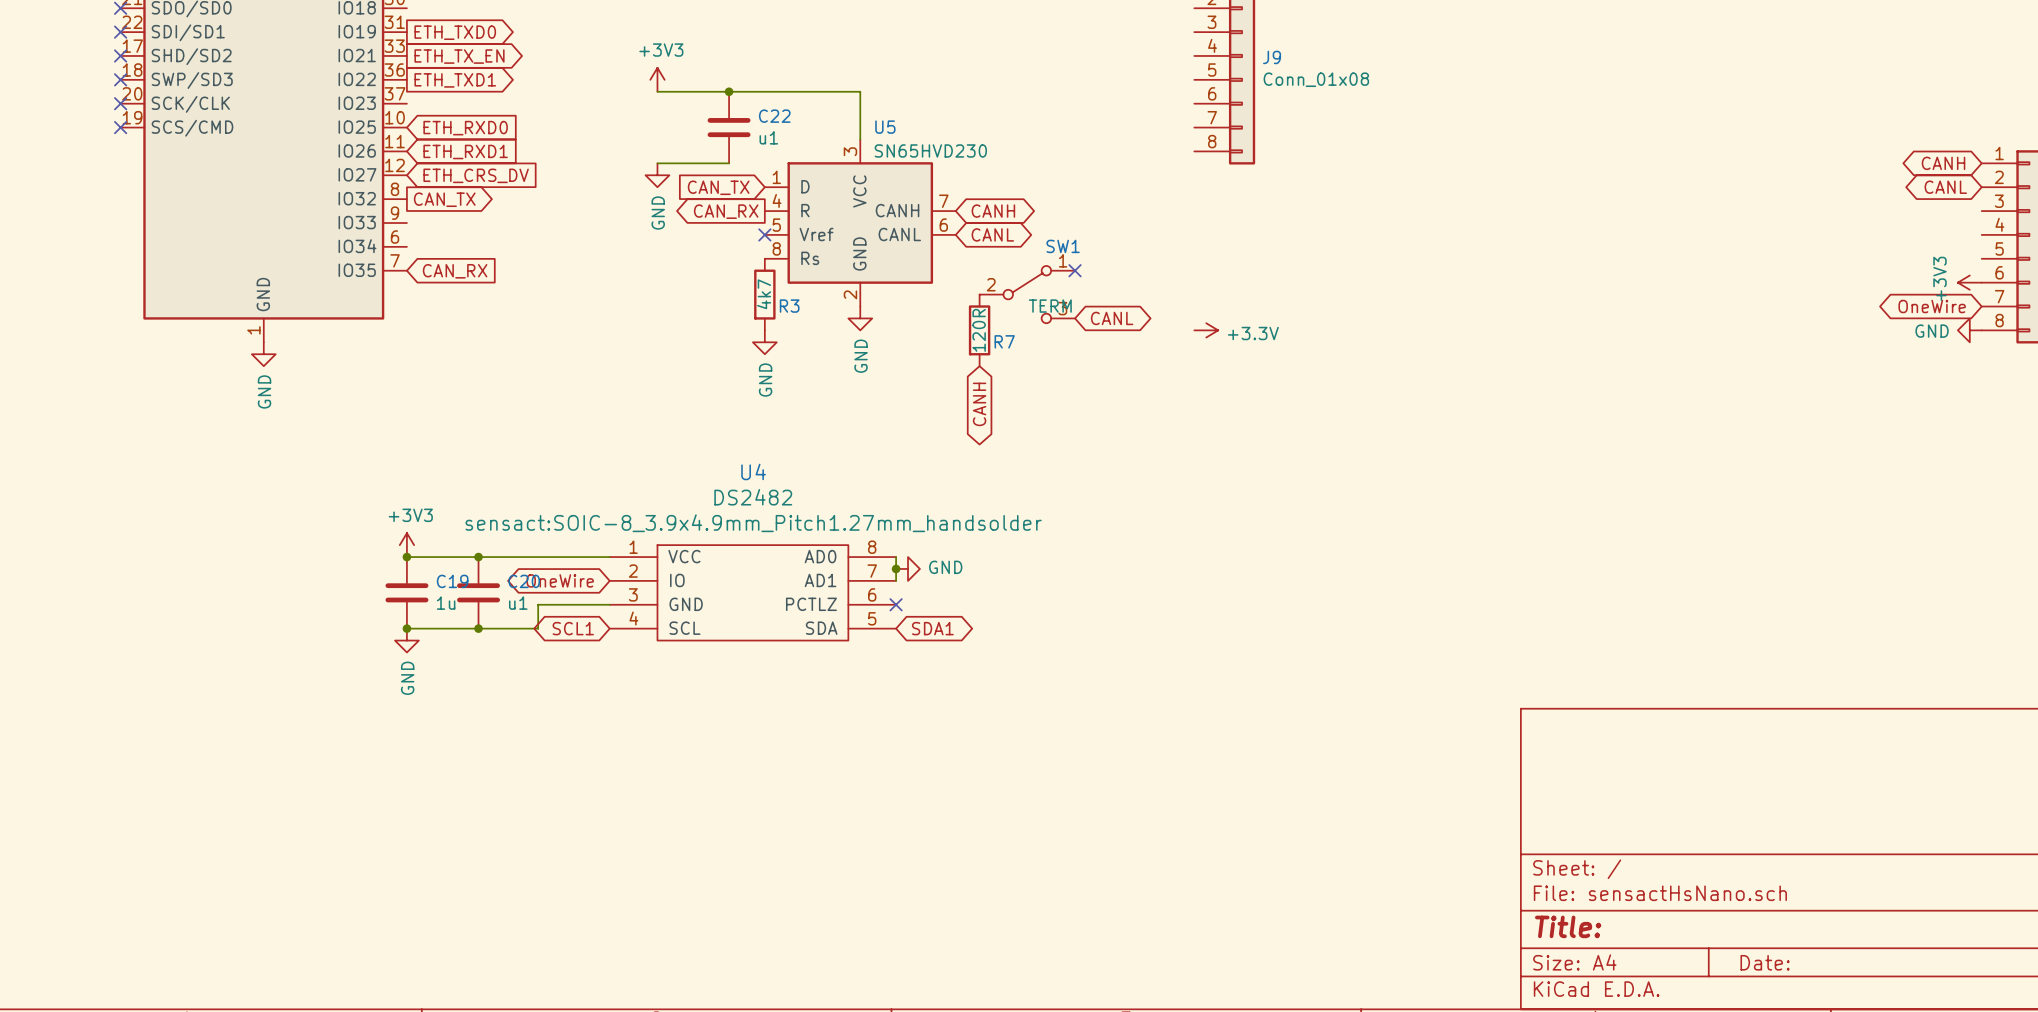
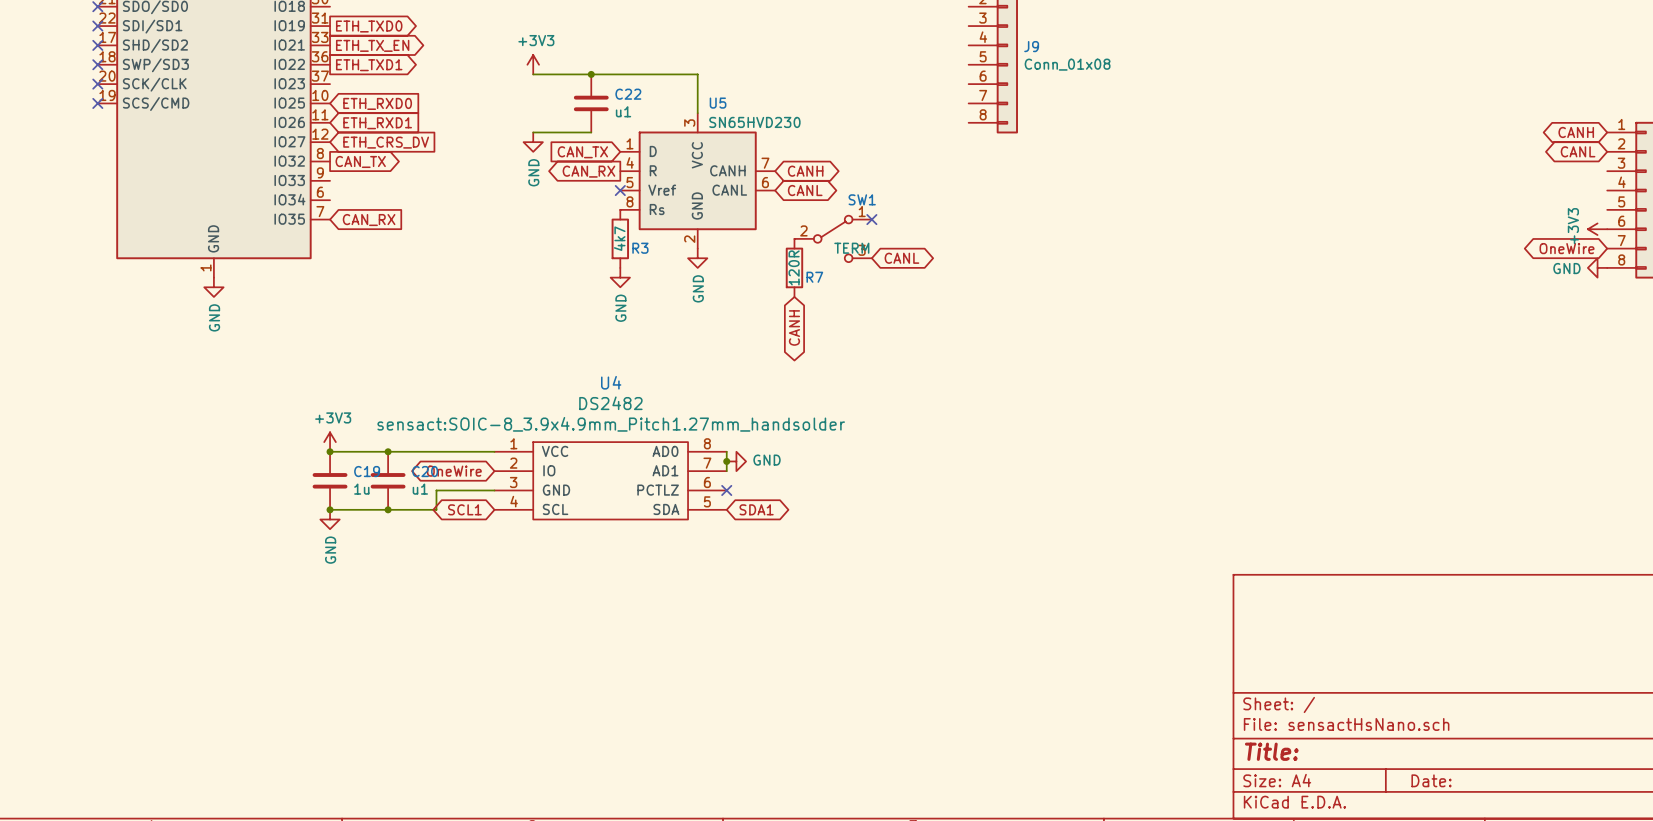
power symbol: +3.3V (1206, 330) -> none

